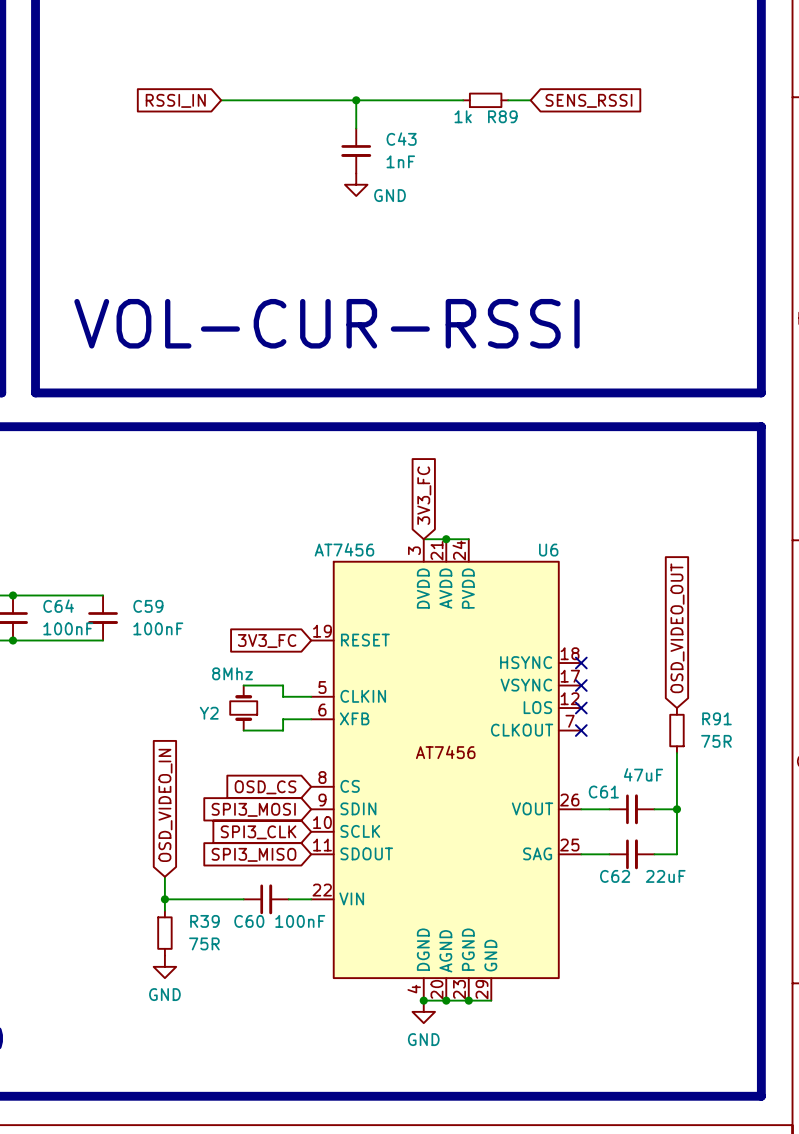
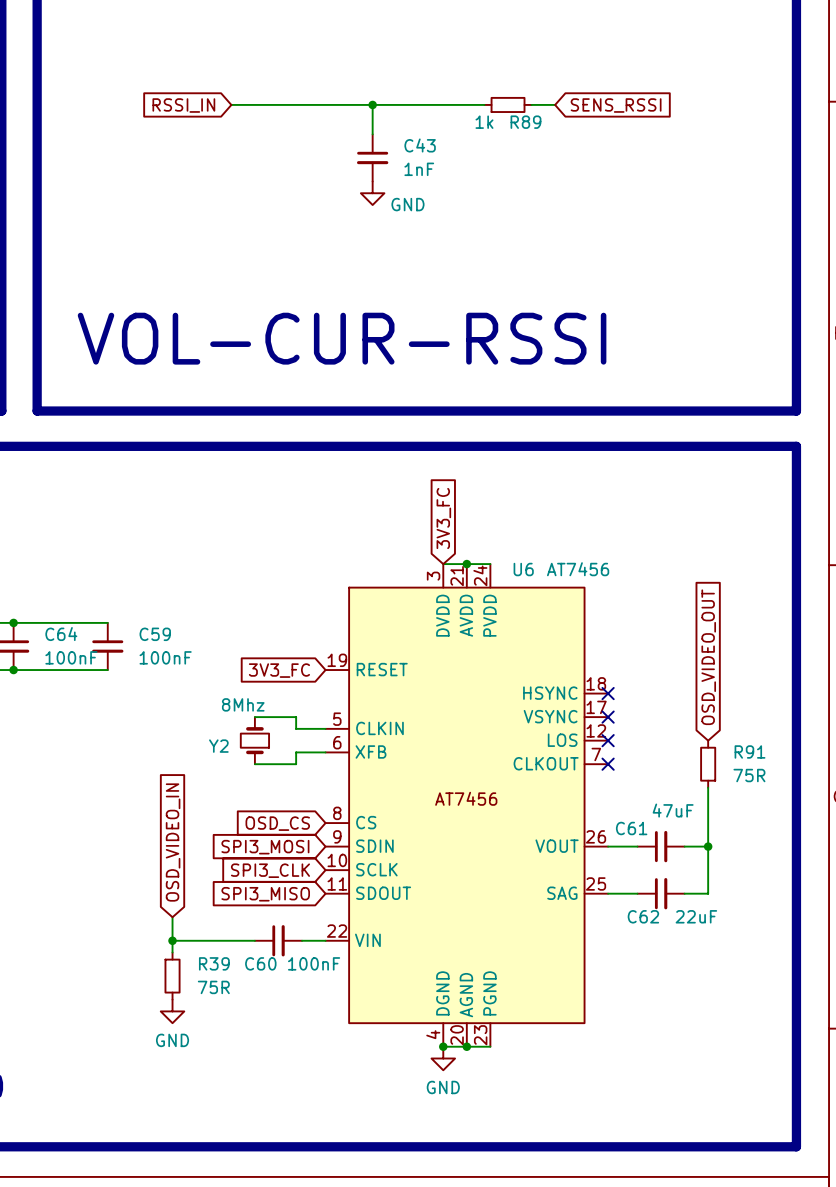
U6 symbol: [311, 539, 582, 1001] -> [325, 564, 609, 1047]
U6 value position: AT7456 (344, 549) -> AT7456 (578, 569)
U6 name position: U6 (548, 550) -> U6 (523, 569)
wire: (468, 1000) (491, 1000) -> none
junction: (468, 1000) -> none

